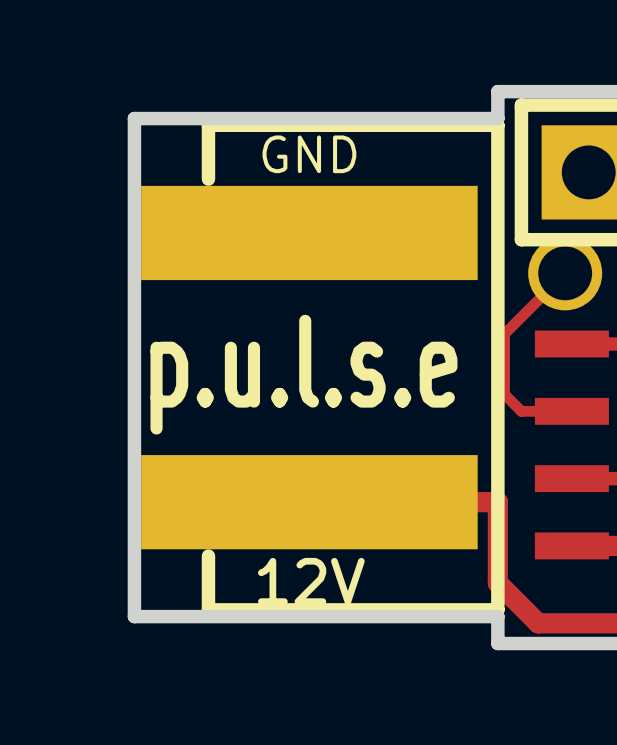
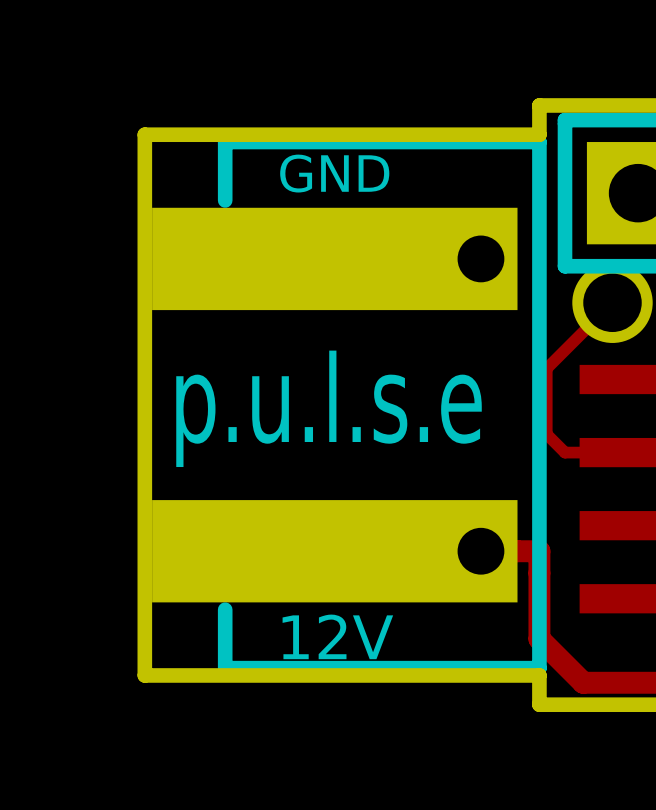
part footprint: [141, 118, 505, 617] -> [152, 134, 547, 676]

